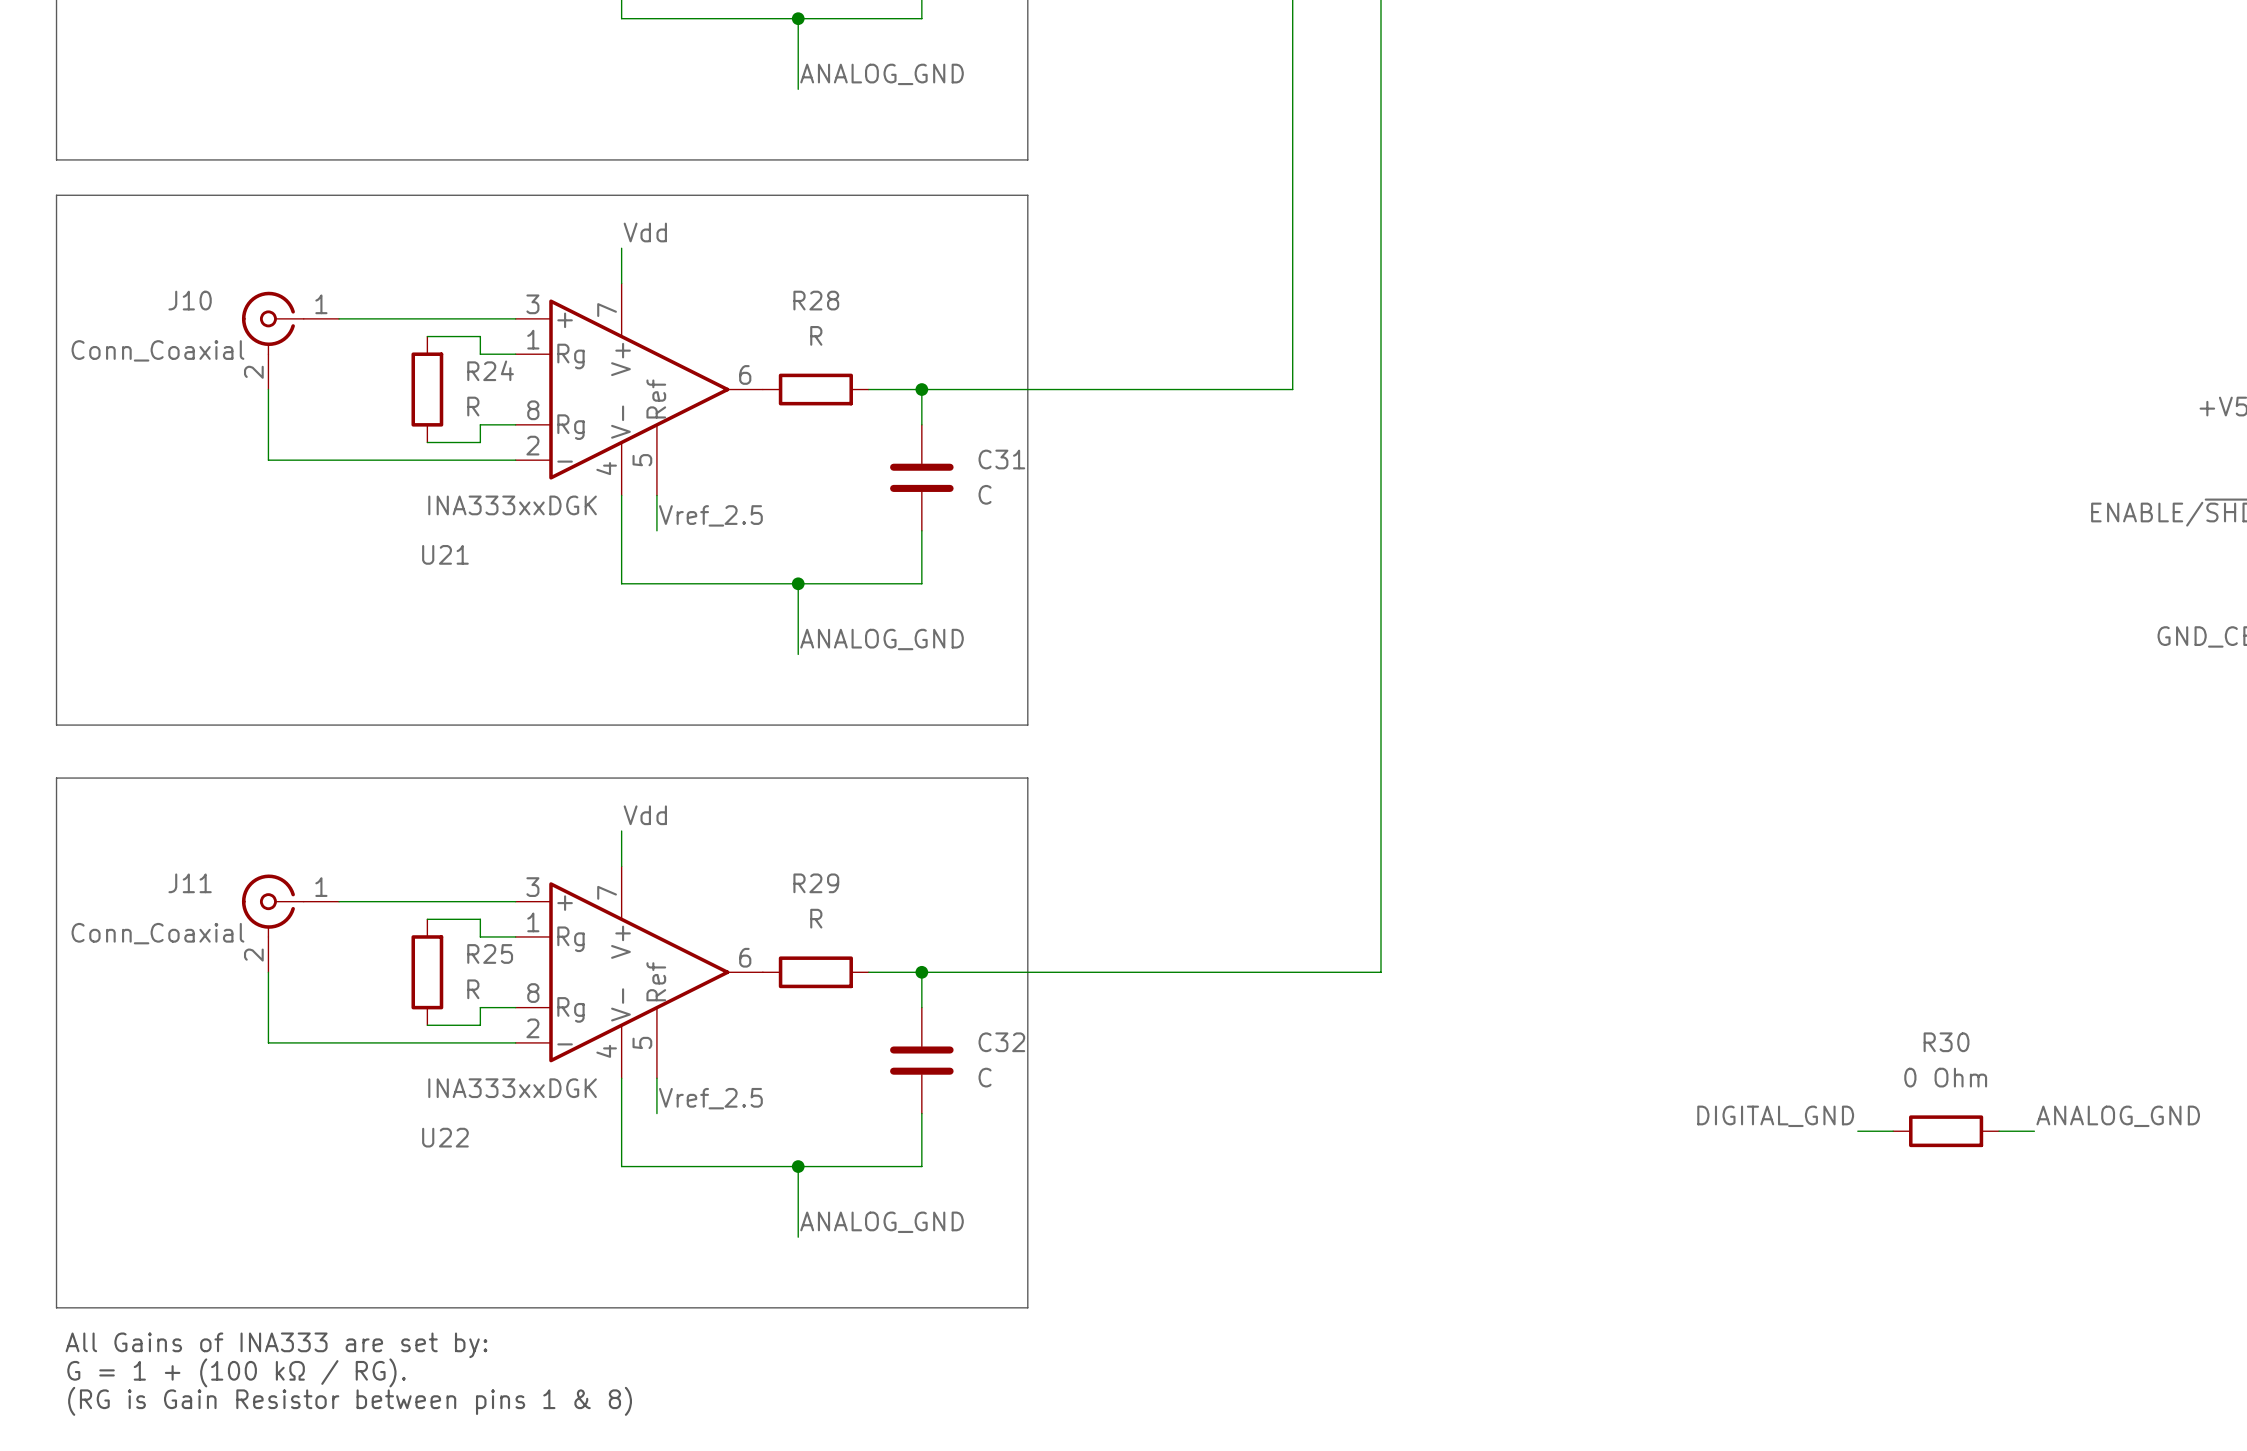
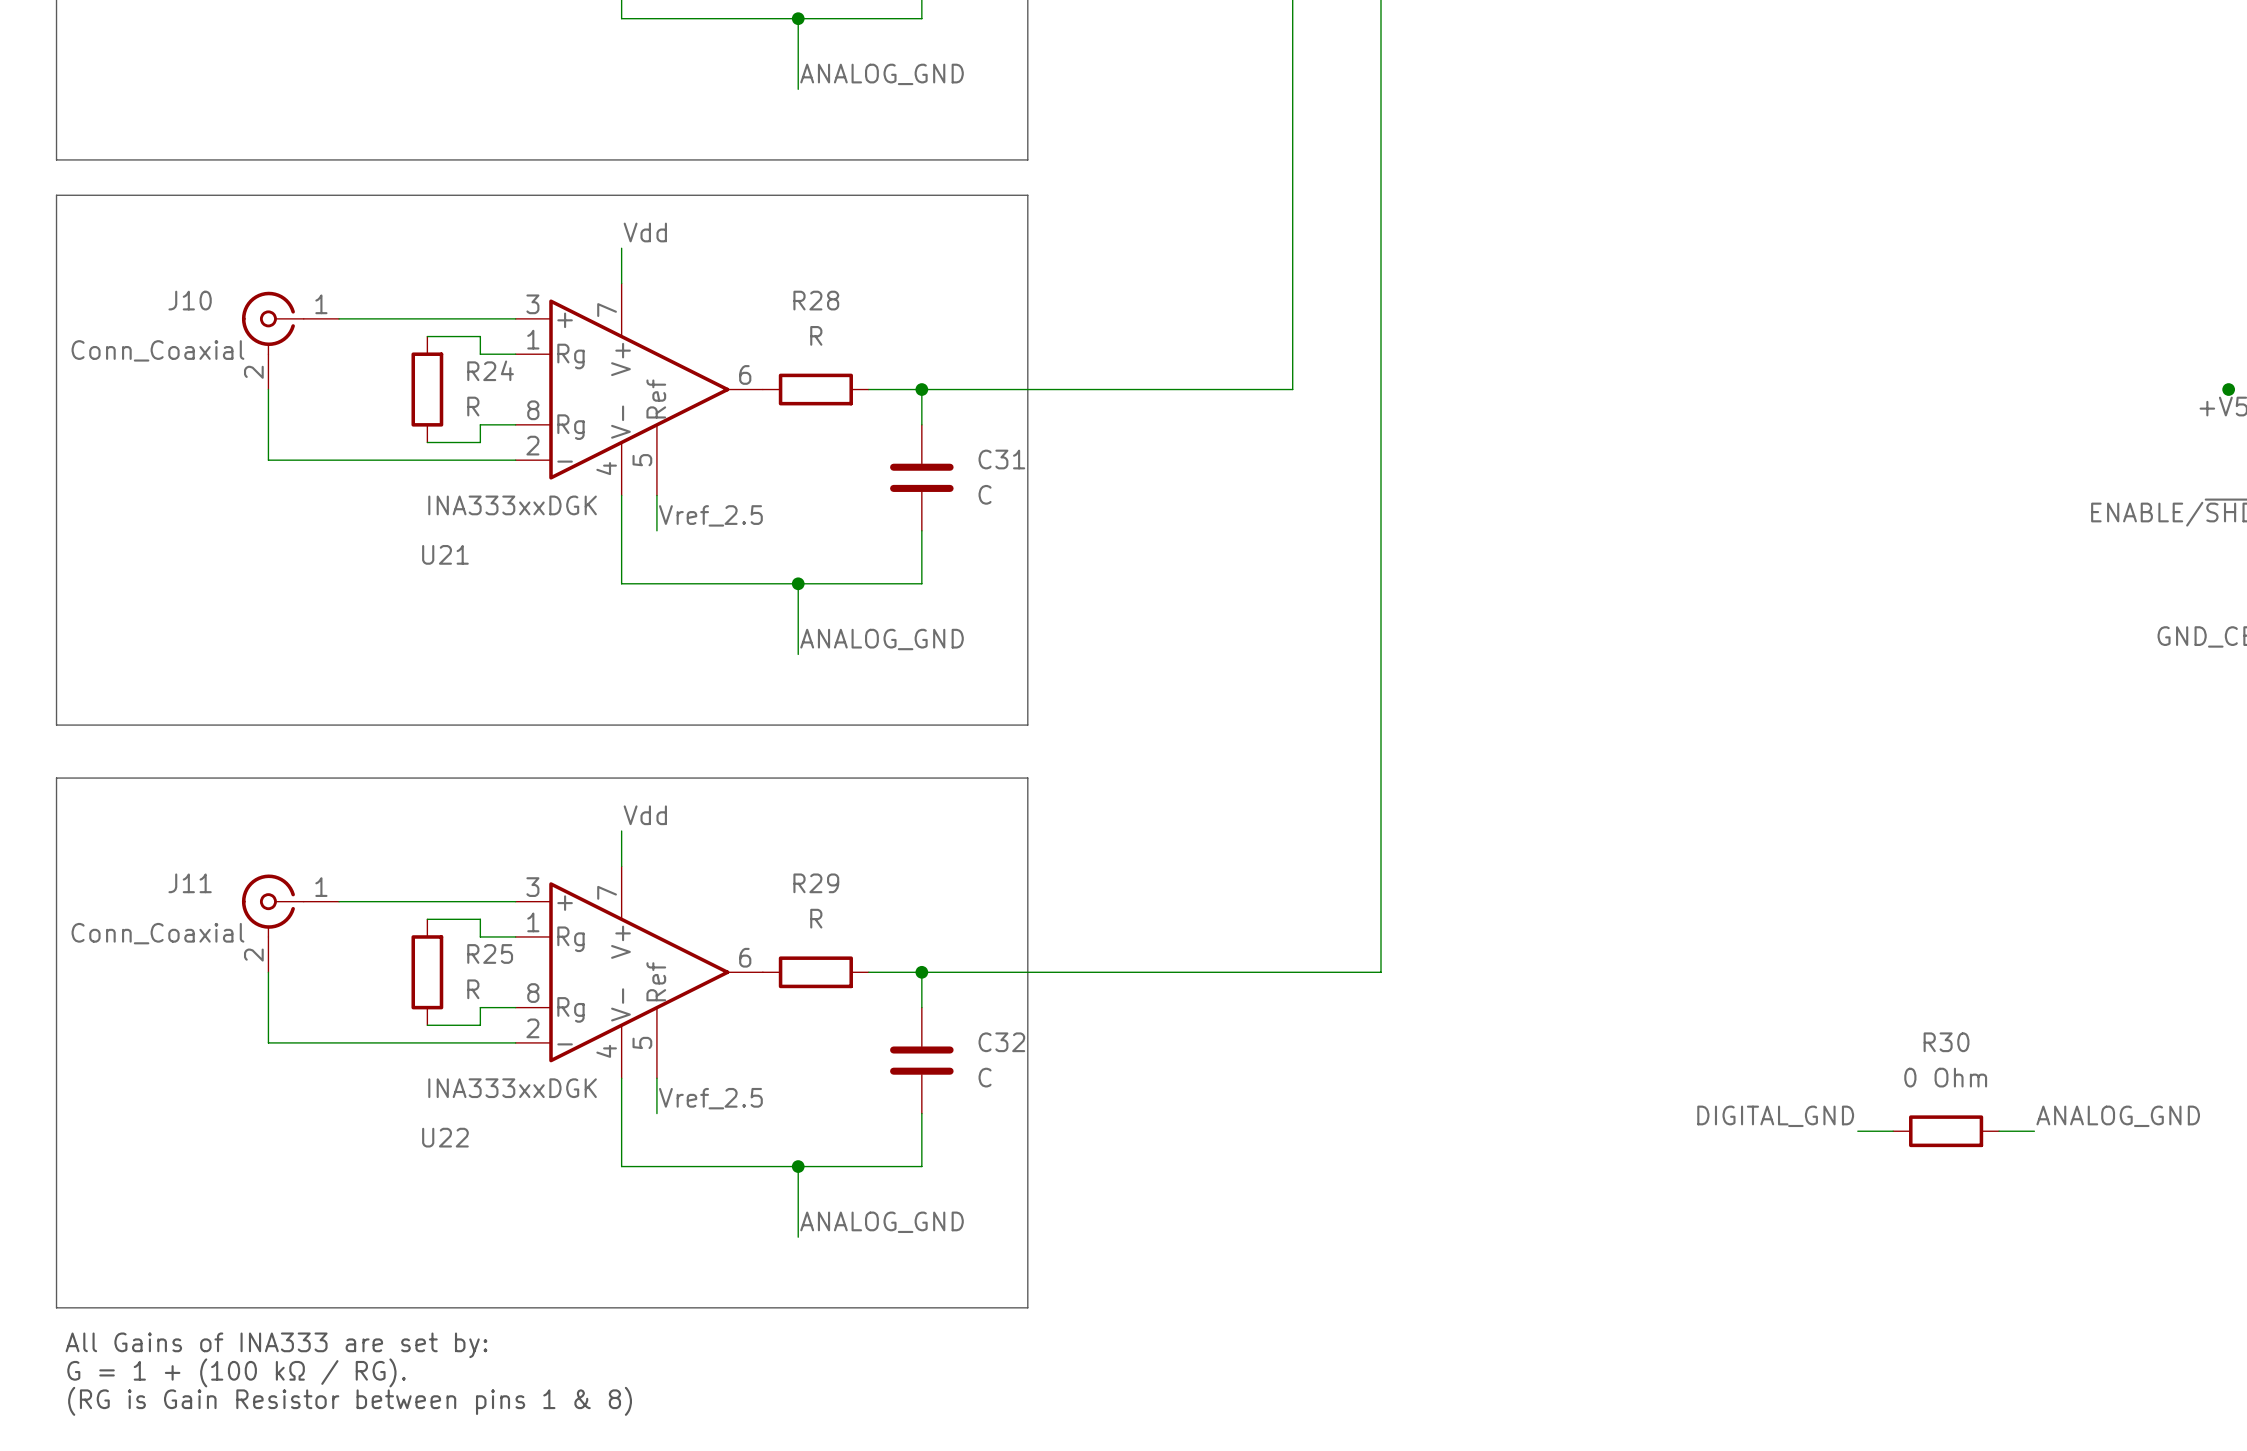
junction: none -> (2228, 389)

